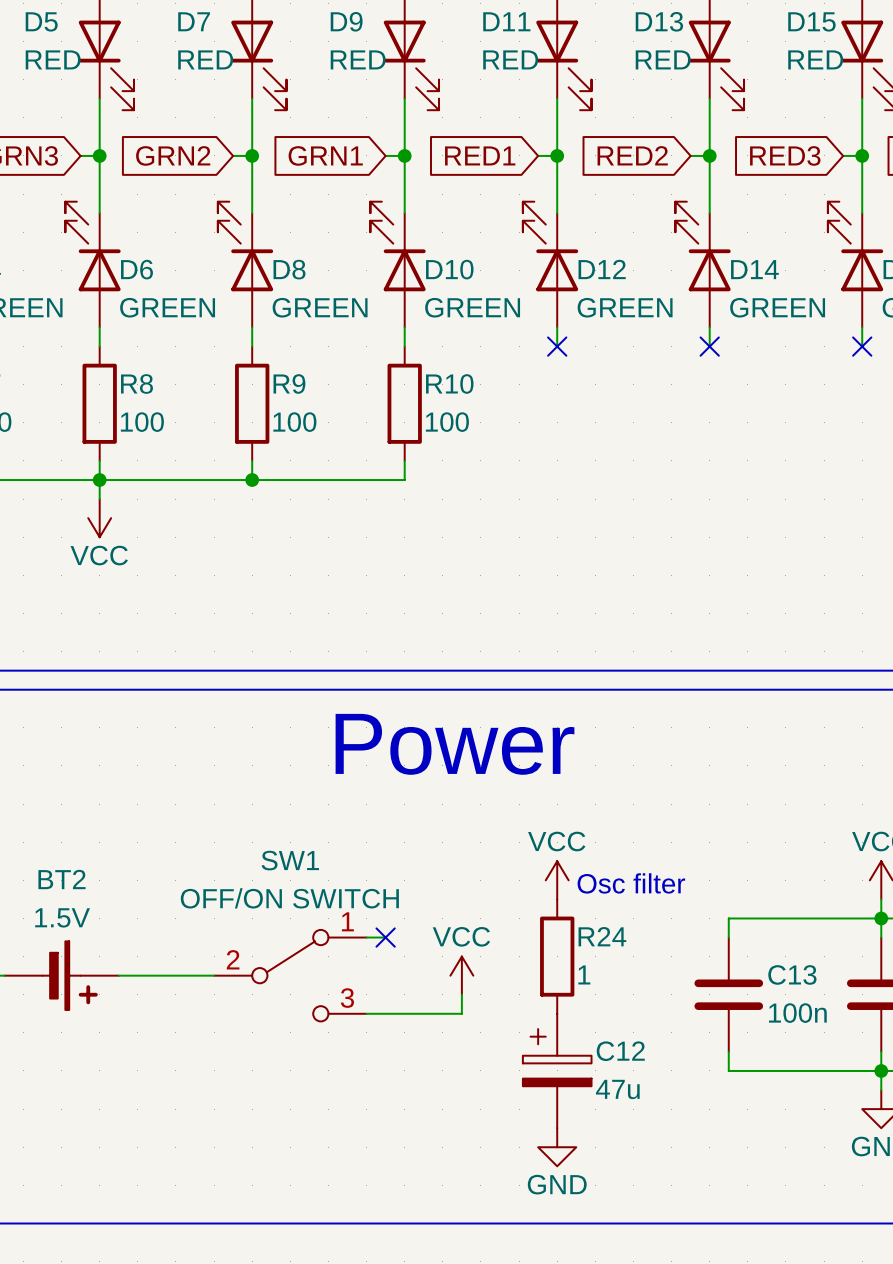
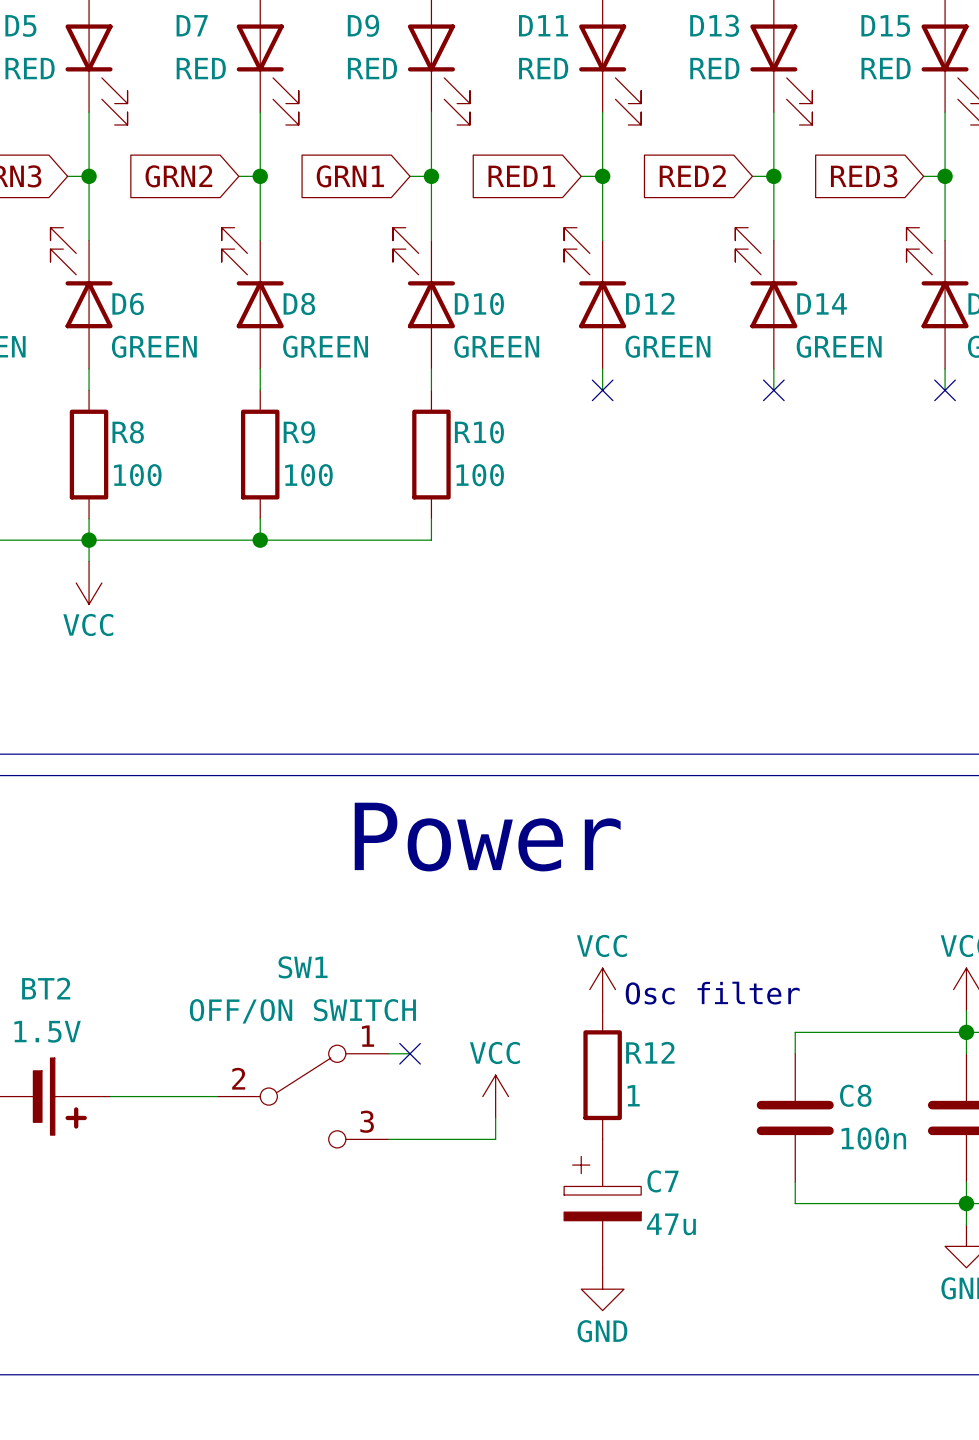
R24 name: R24 (602, 936) -> R12 (650, 1052)
C13 name: C13 (792, 974) -> C8 (855, 1095)
C12 name: C12 (620, 1051) -> C7 (663, 1181)

